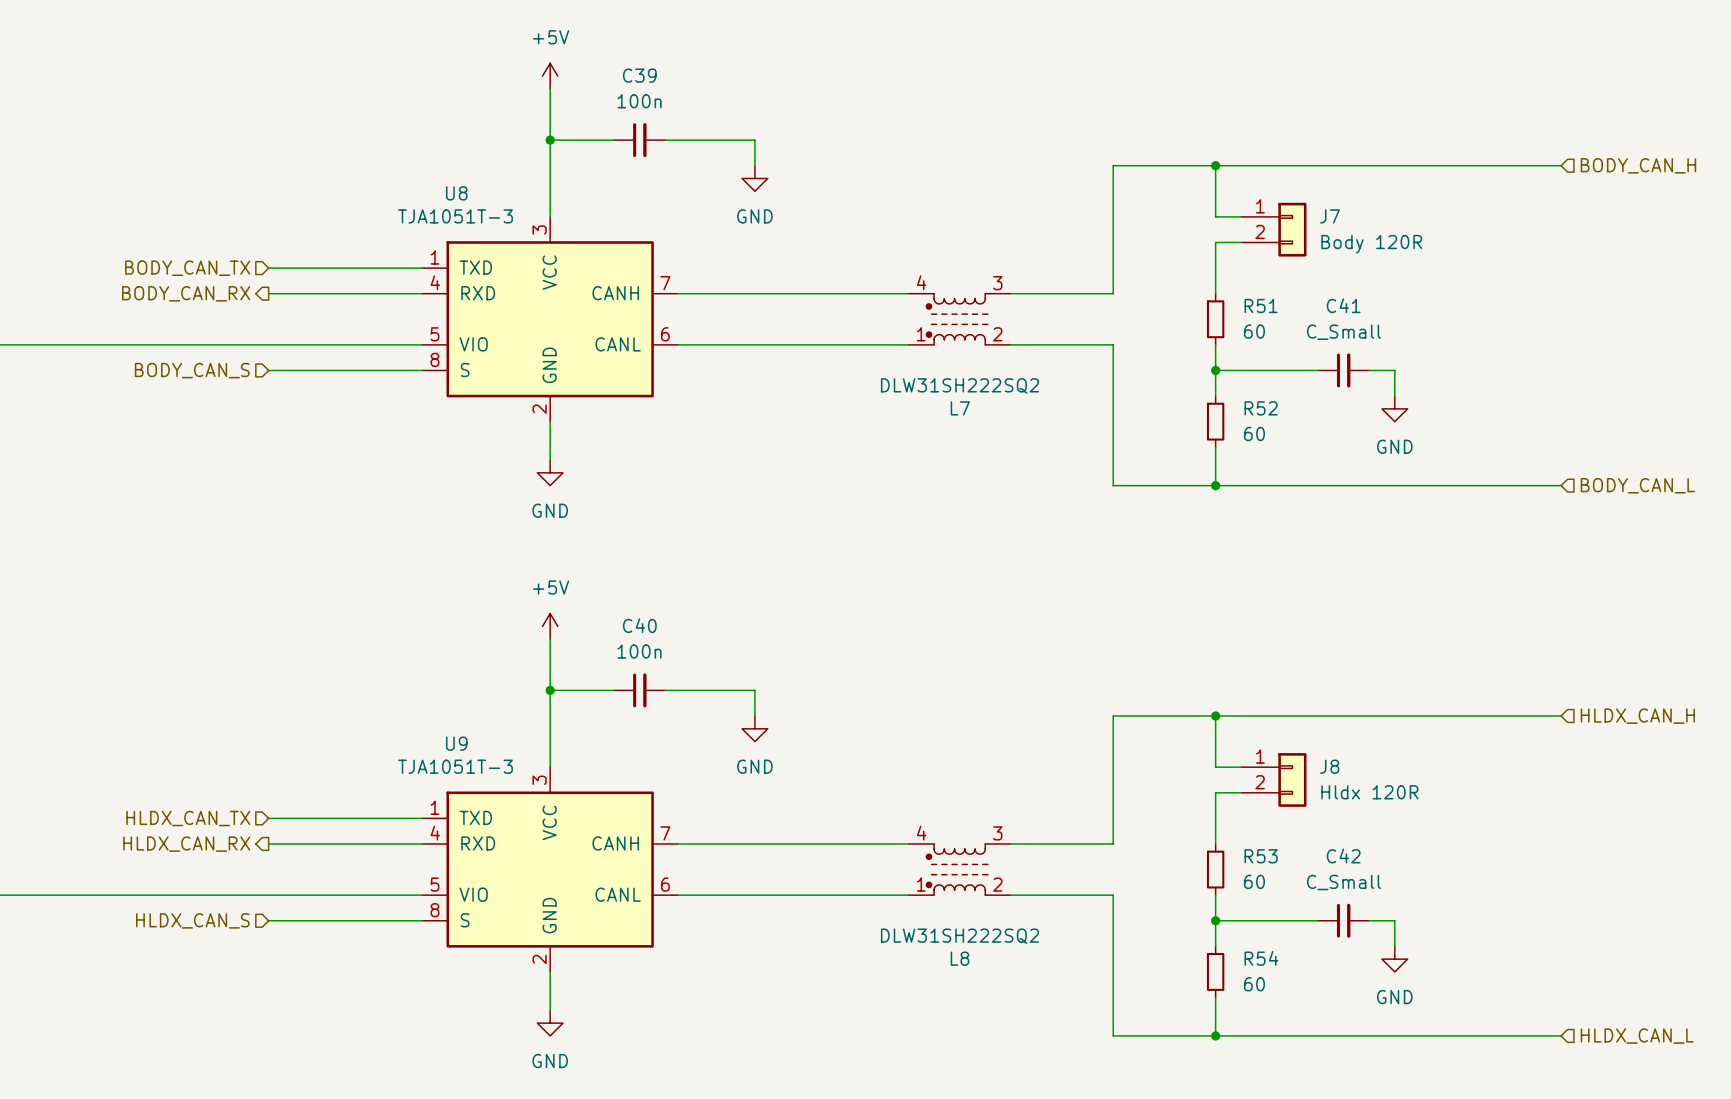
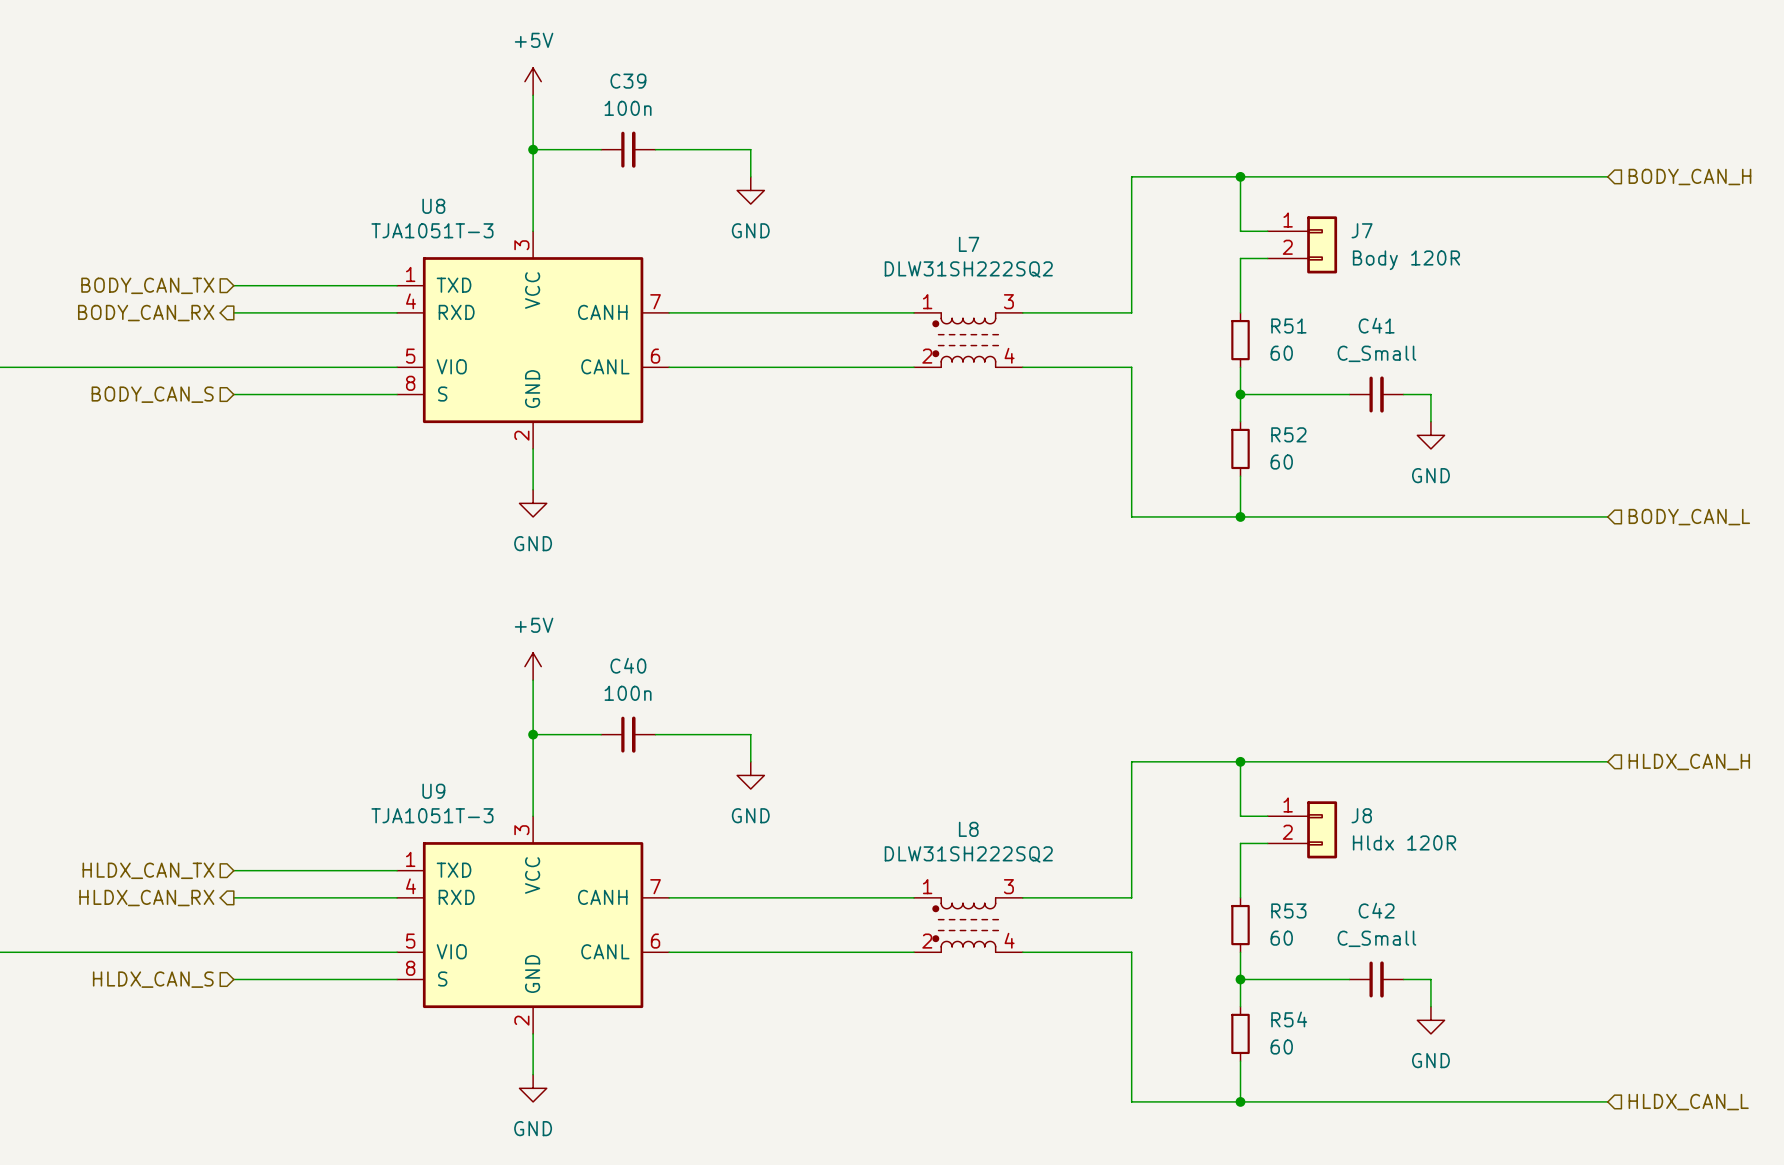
L7 symbol: [908, 293, 1011, 345] -> [914, 312, 1023, 368]
L7 value position: DLW31SH222SQ2 (959, 385) -> DLW31SH222SQ2 (968, 269)
L7 name position: L7 (960, 408) -> L7 (969, 244)
L8 symbol: [908, 843, 1011, 896] -> [914, 897, 1023, 953]
L8 value position: DLW31SH222SQ2 (959, 936) -> DLW31SH222SQ2 (968, 854)
L8 name position: L8 (959, 958) -> L8 (968, 829)

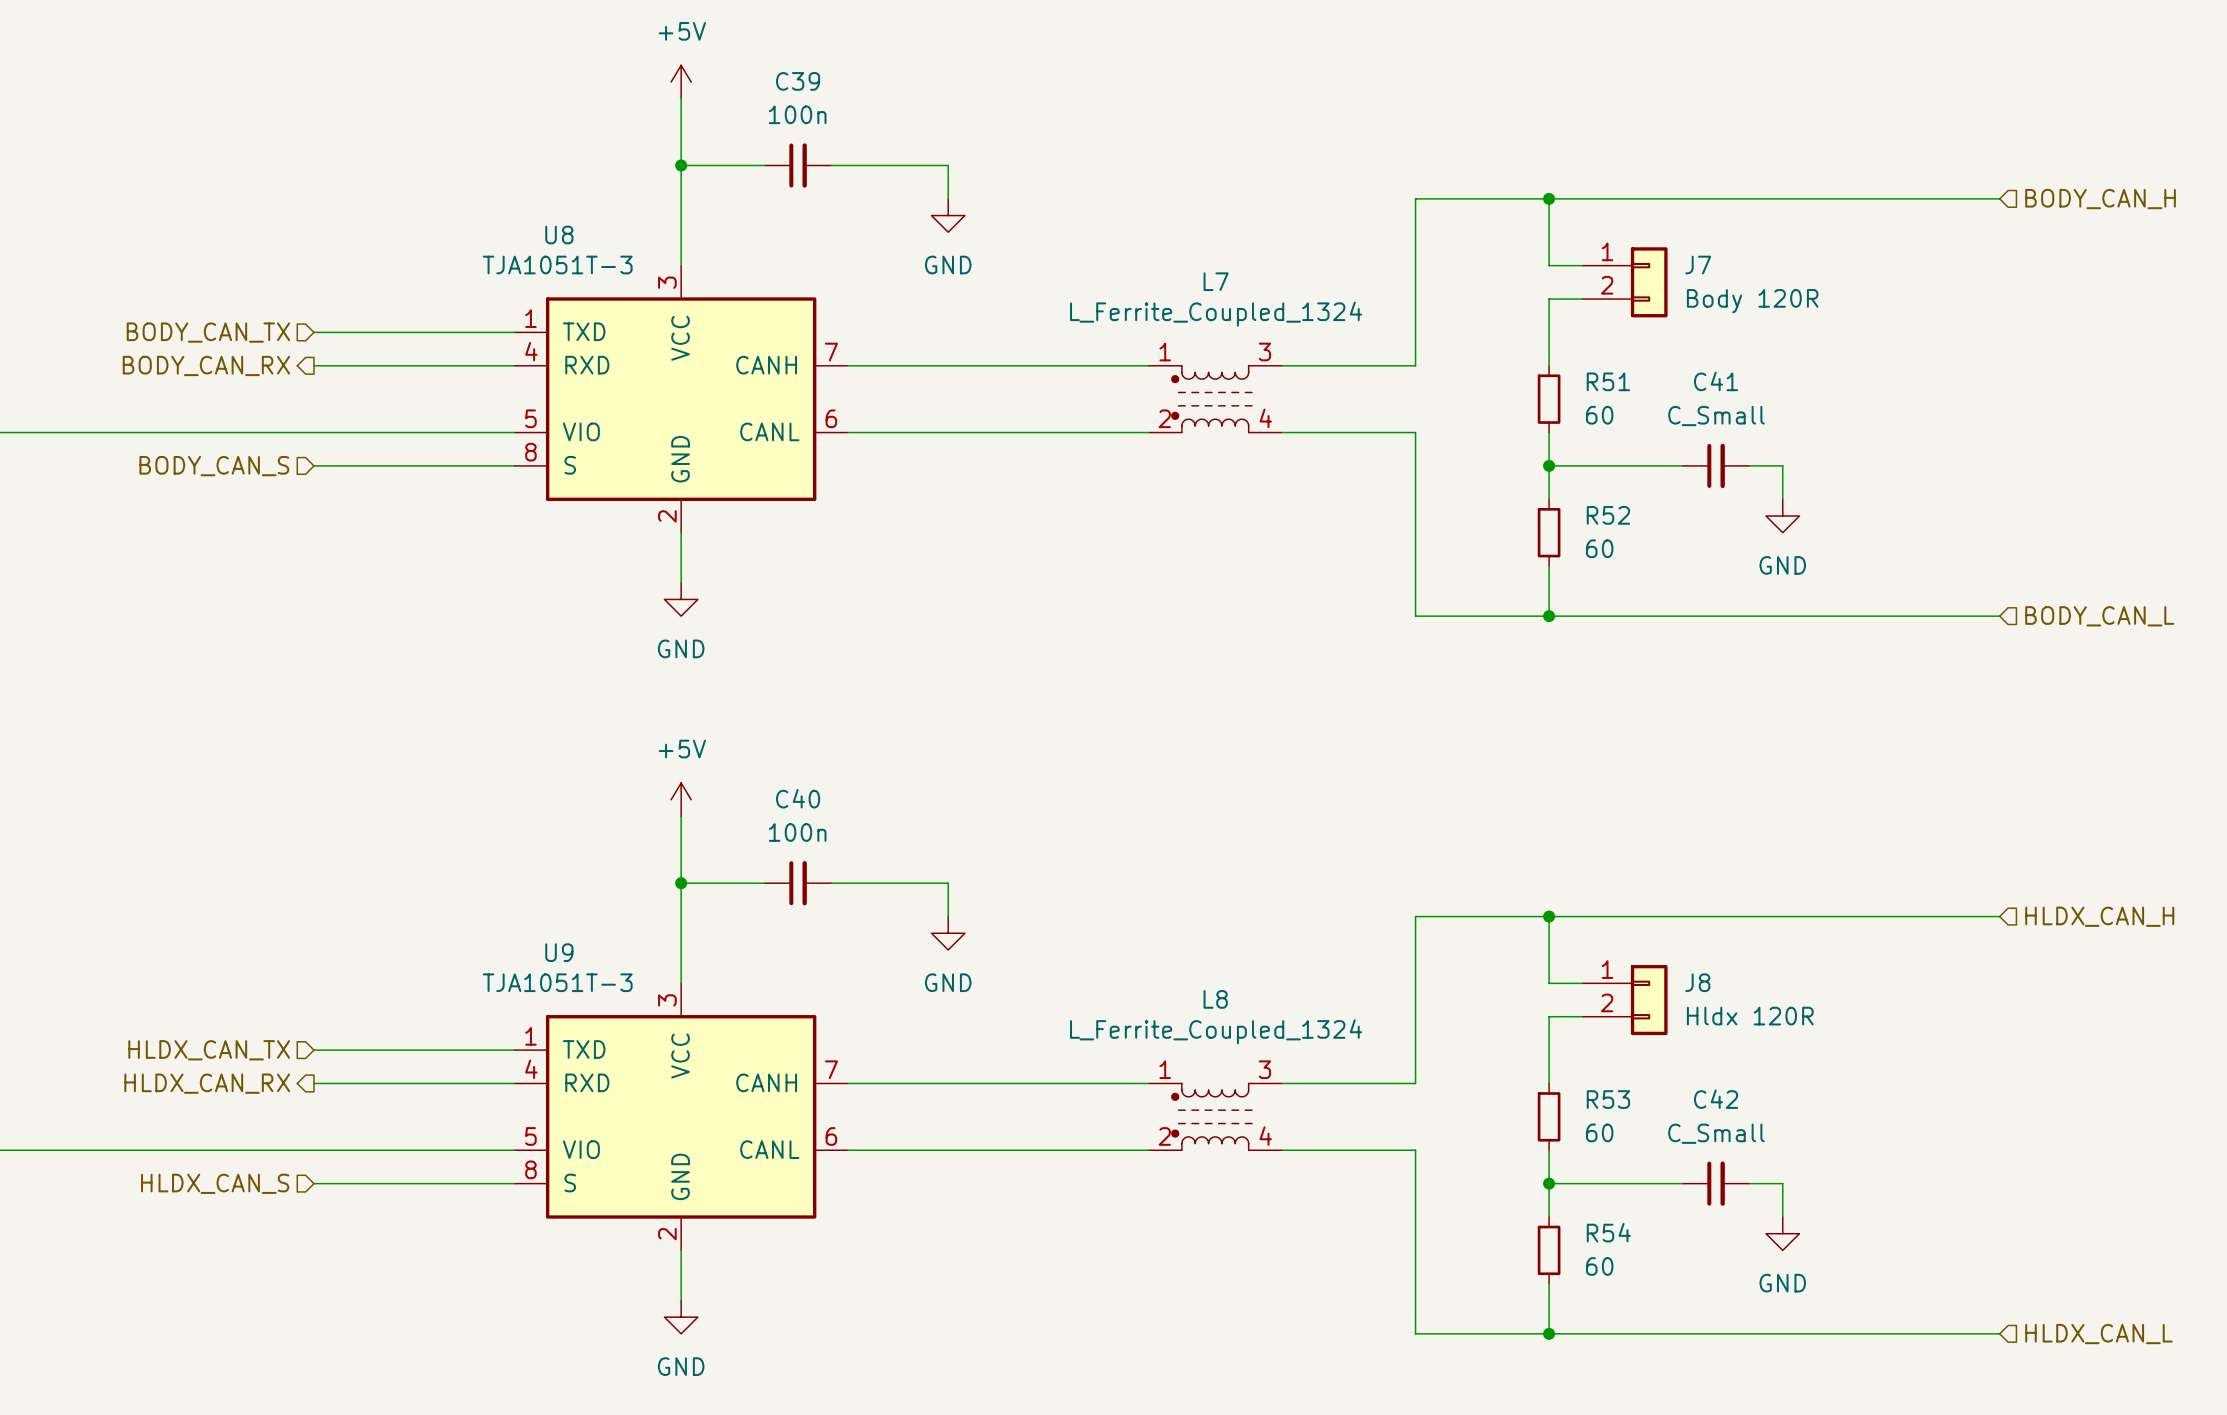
L7 value: DLW31SH222SQ2 (968, 269) -> L_Ferrite_Coupled_1324 (1216, 314)
L8 value: DLW31SH222SQ2 (968, 854) -> L_Ferrite_Coupled_1324 (1216, 1031)

